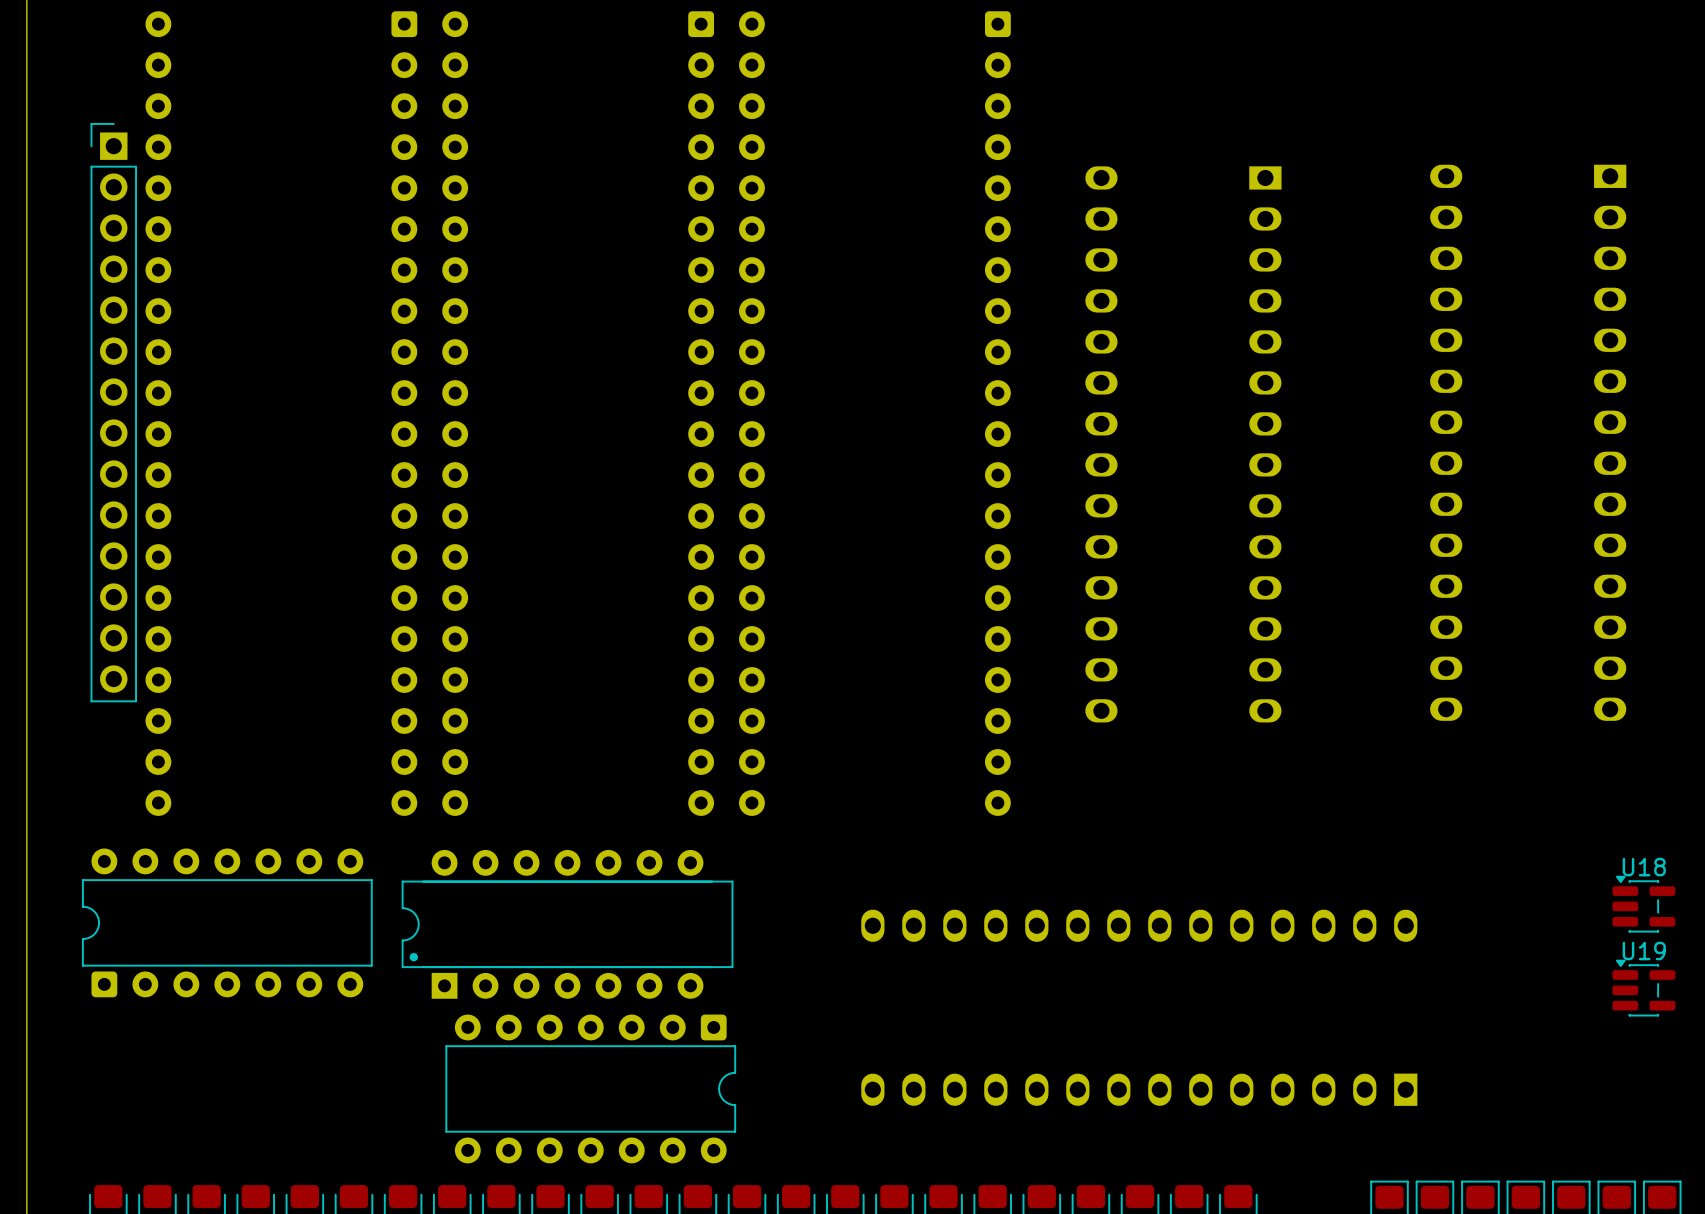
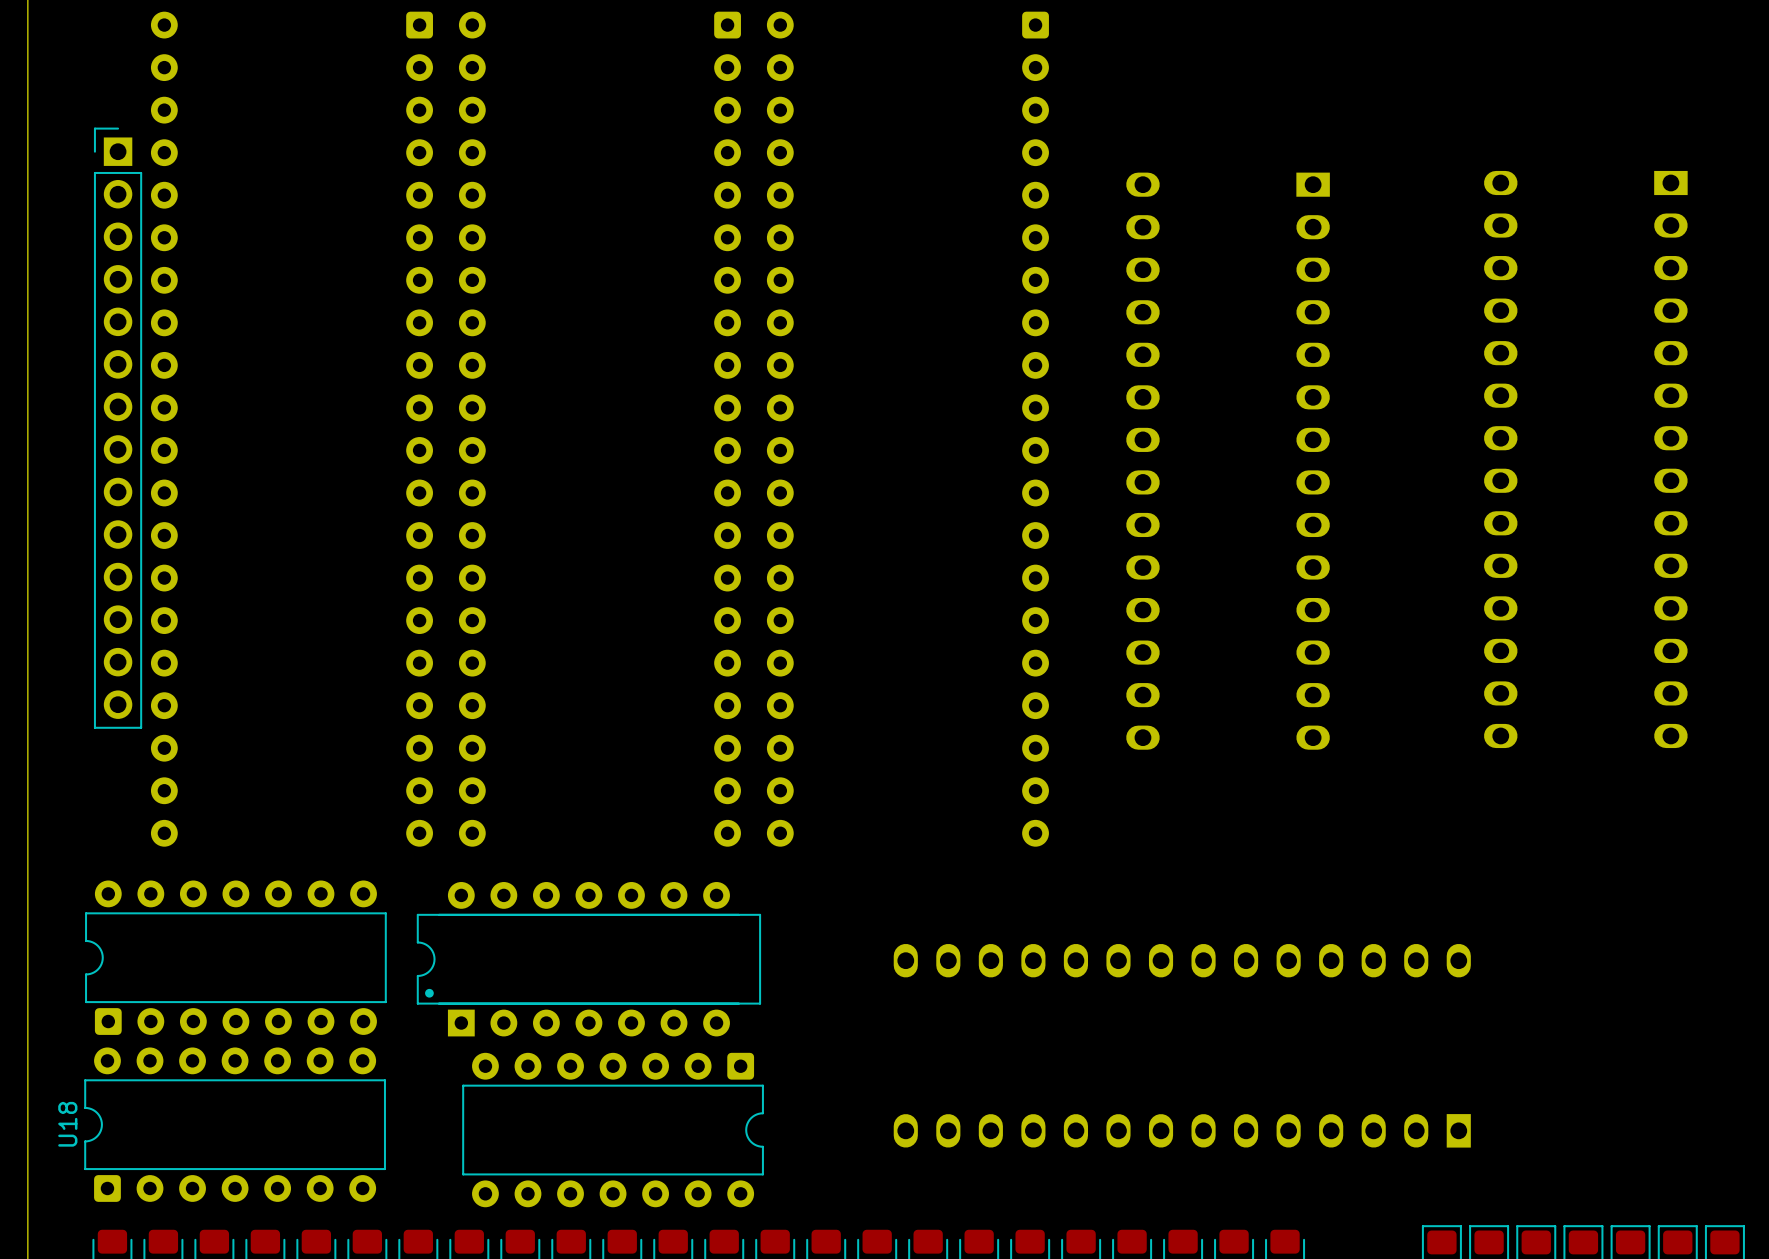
U18 name position: U18 (1644, 867) -> U18 (67, 1124)
U18 footprint: [1612, 875, 1676, 933] -> [84, 1047, 386, 1202]
U19: (1643, 988) -> none

